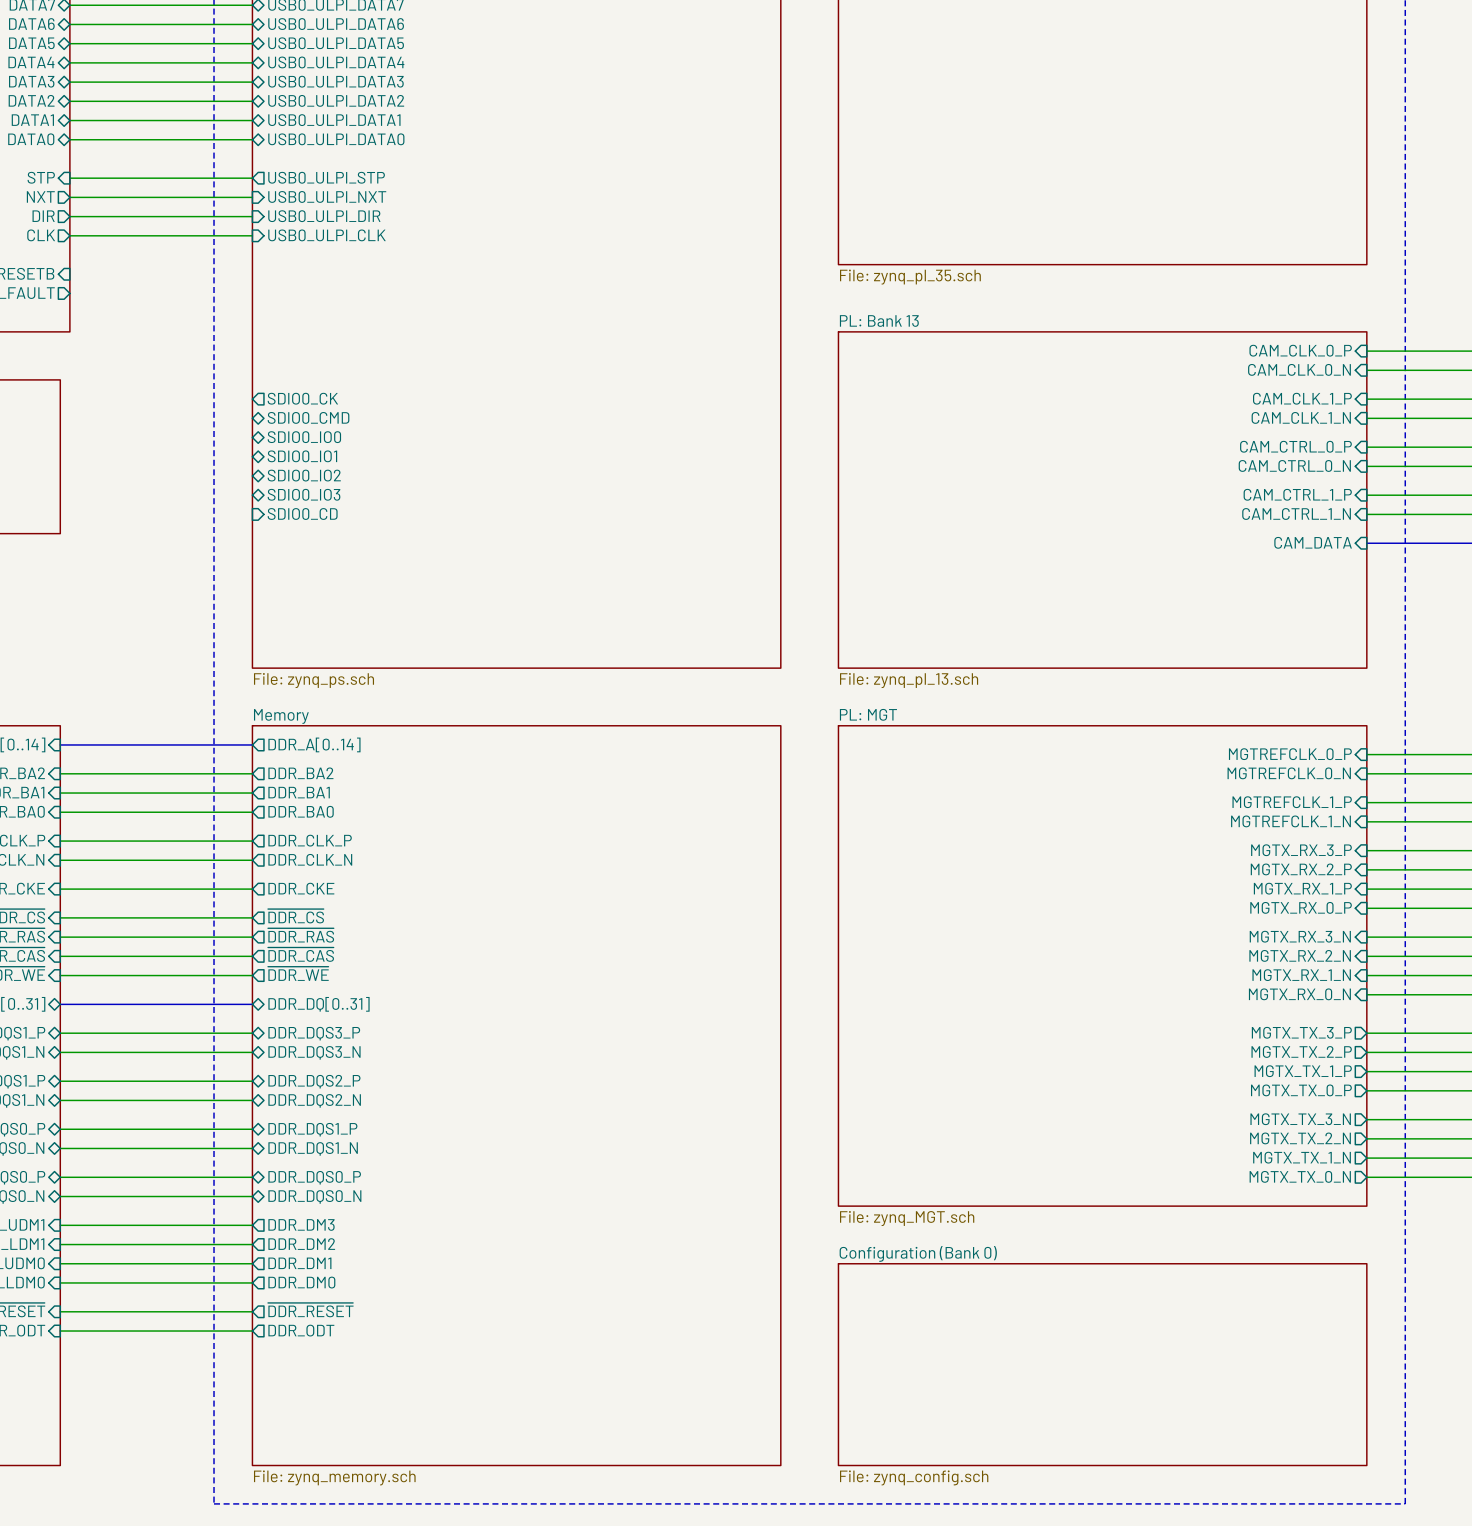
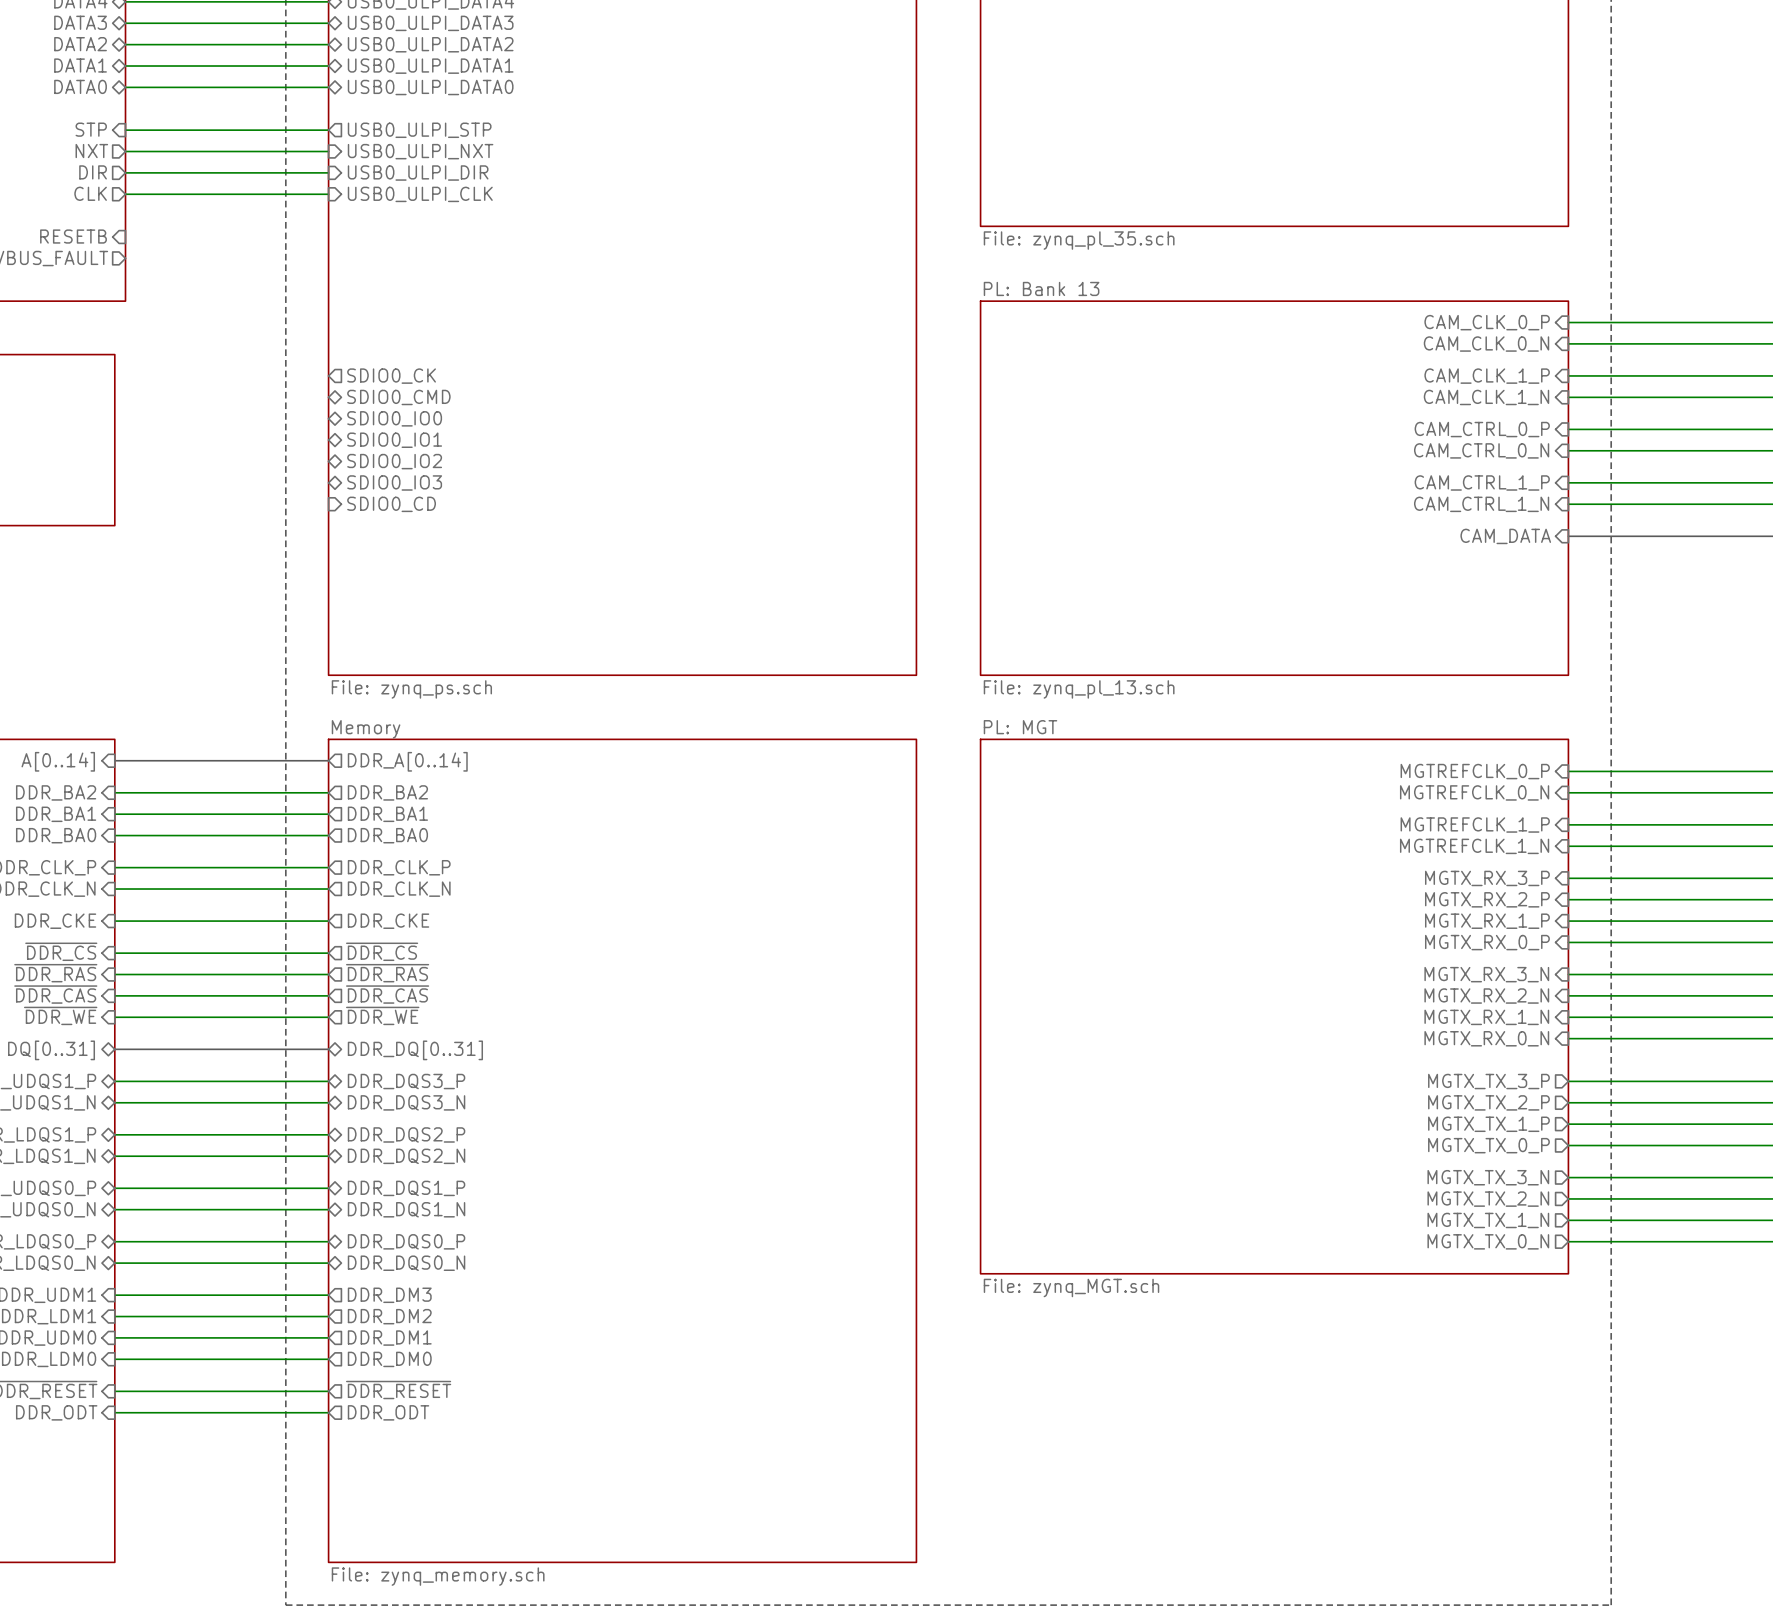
sheet Configuration (Bank 0): File: zynq_config.sch (1102, 1364) -> none

